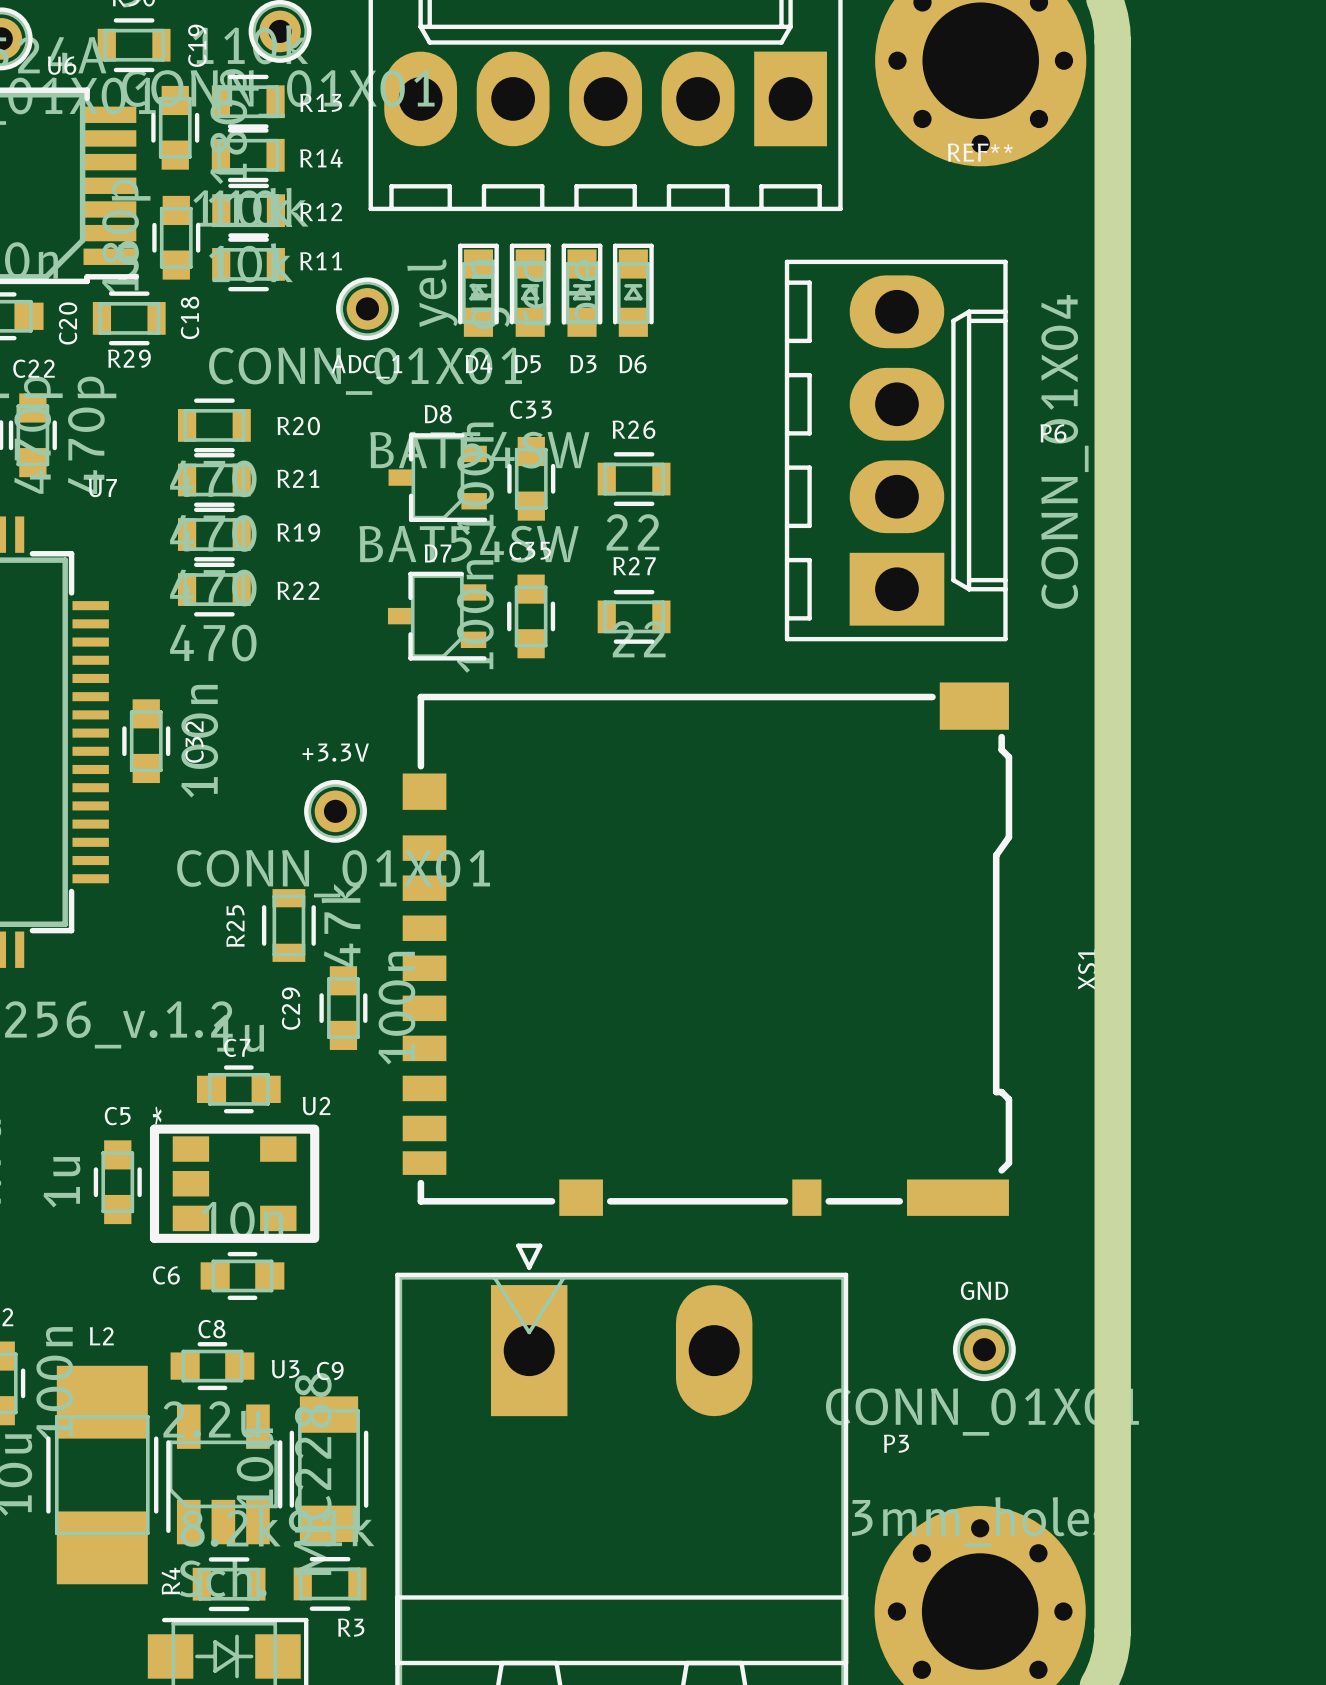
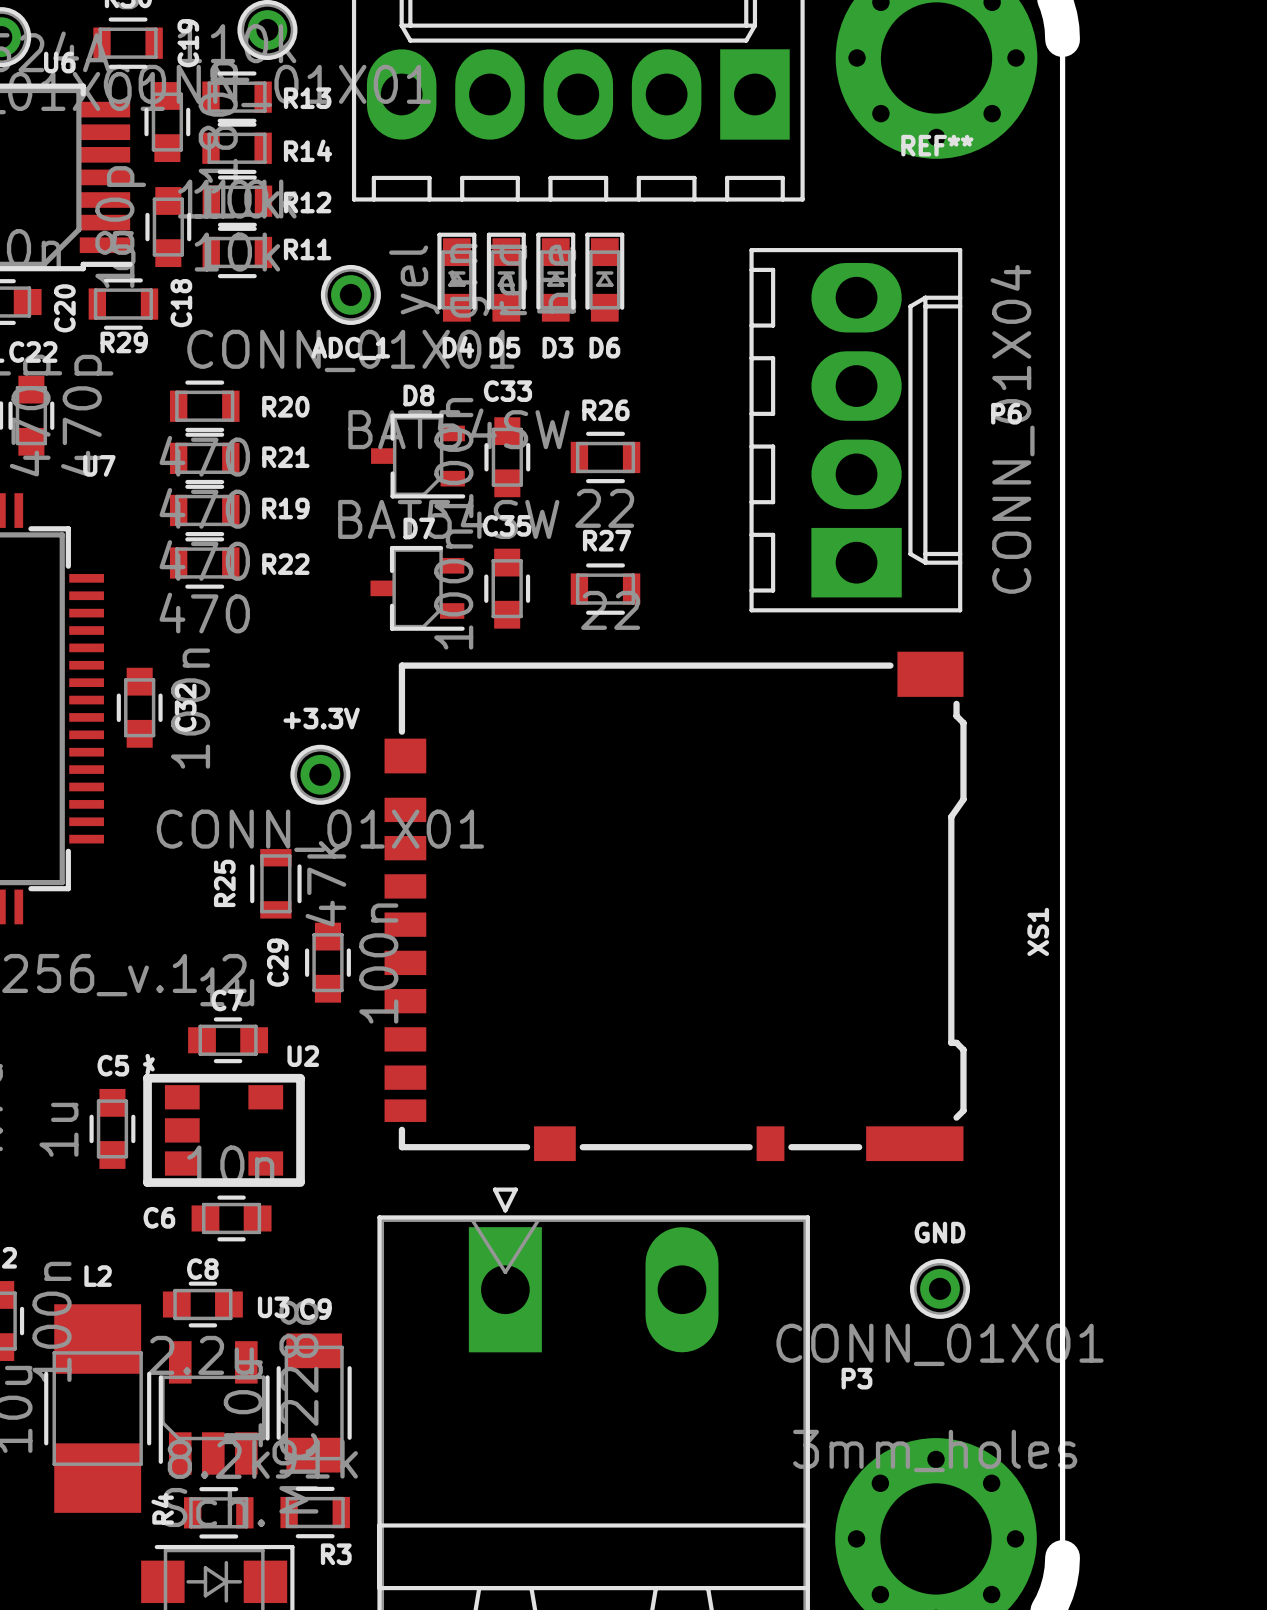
board edge width: thick (1112, 41) (1112, 1630) -> thin (1062, 39) (1062, 1557)

